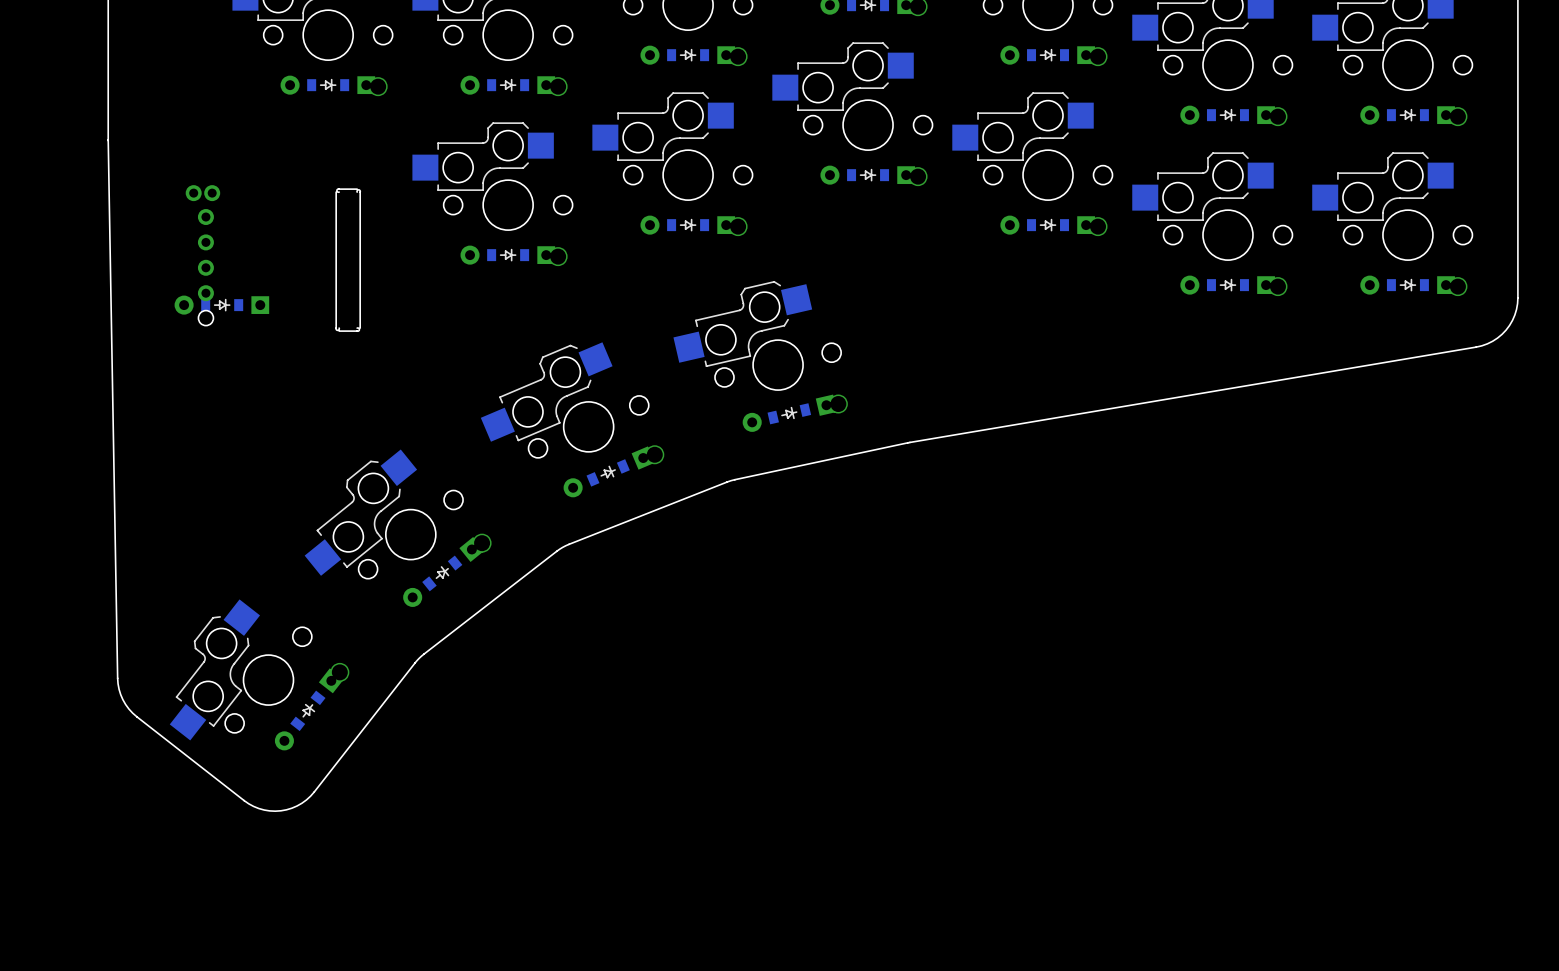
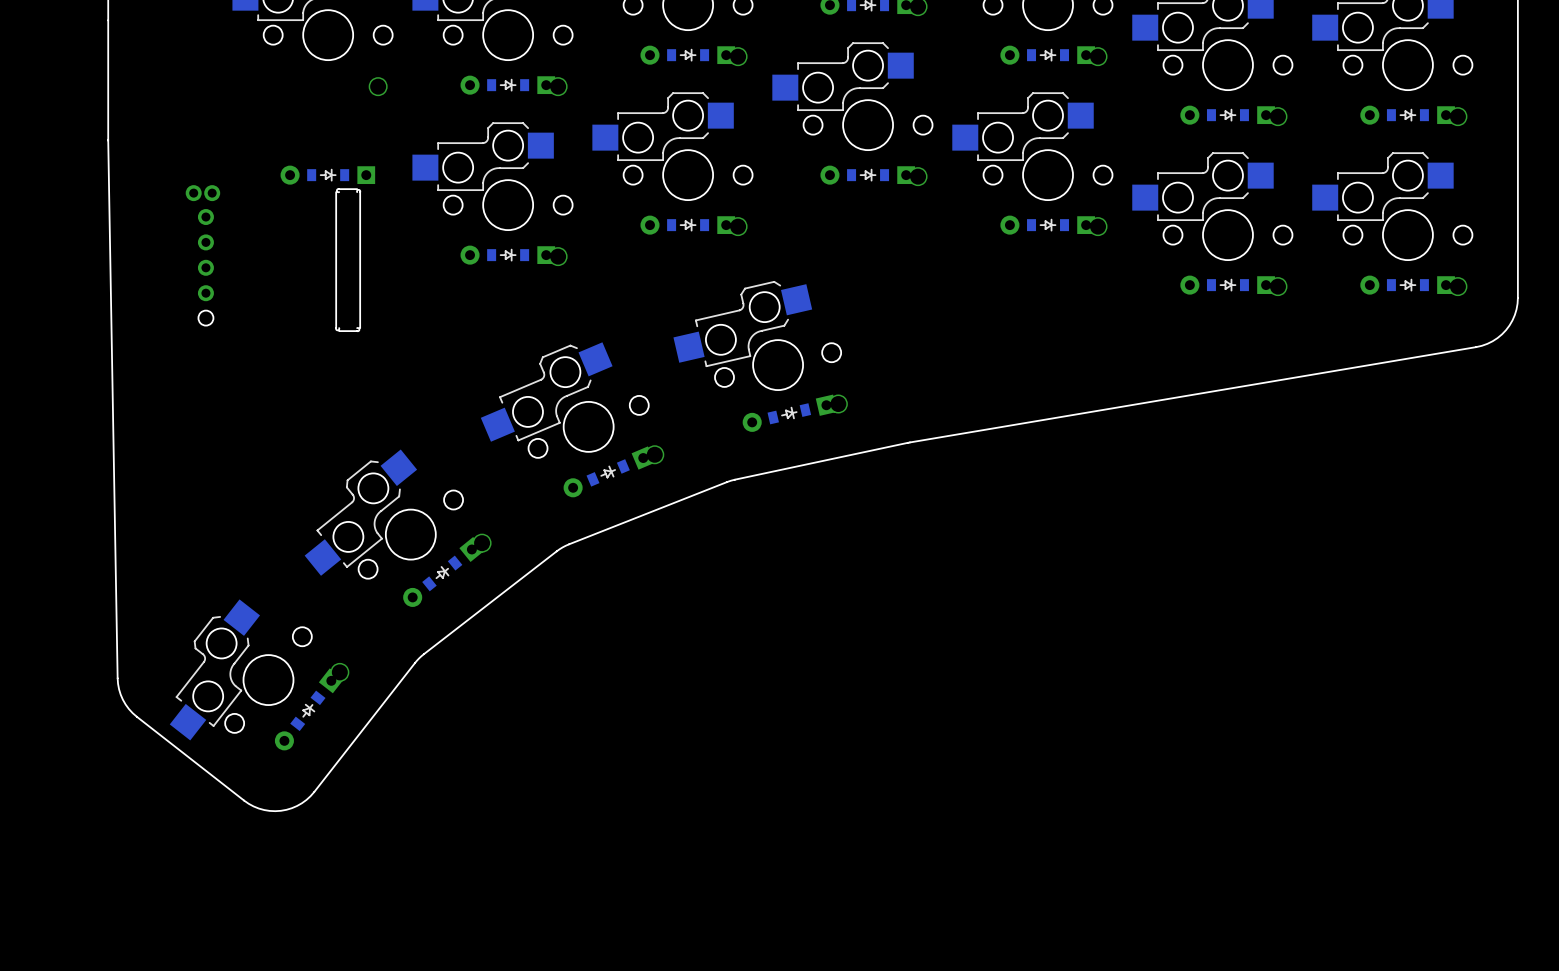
part: (327, 85) -> none
part: none -> (327, 175)
part: (221, 305) -> none

